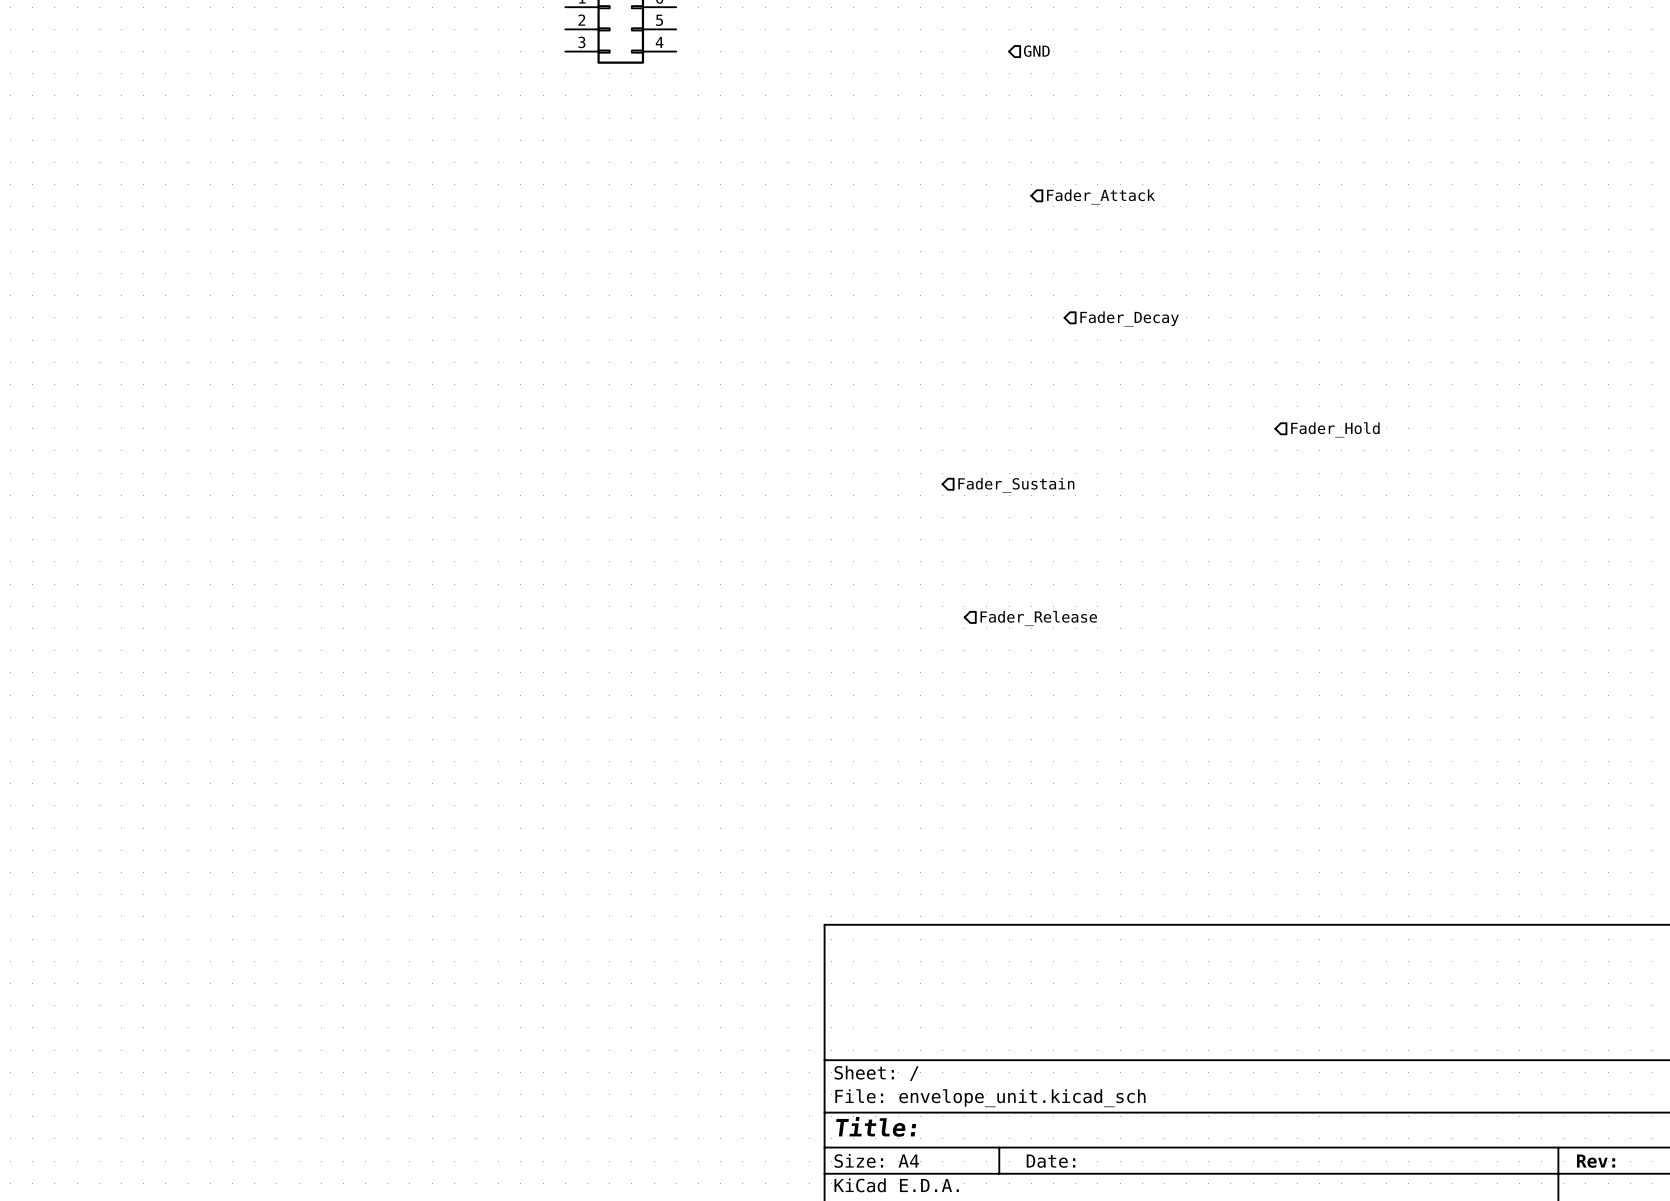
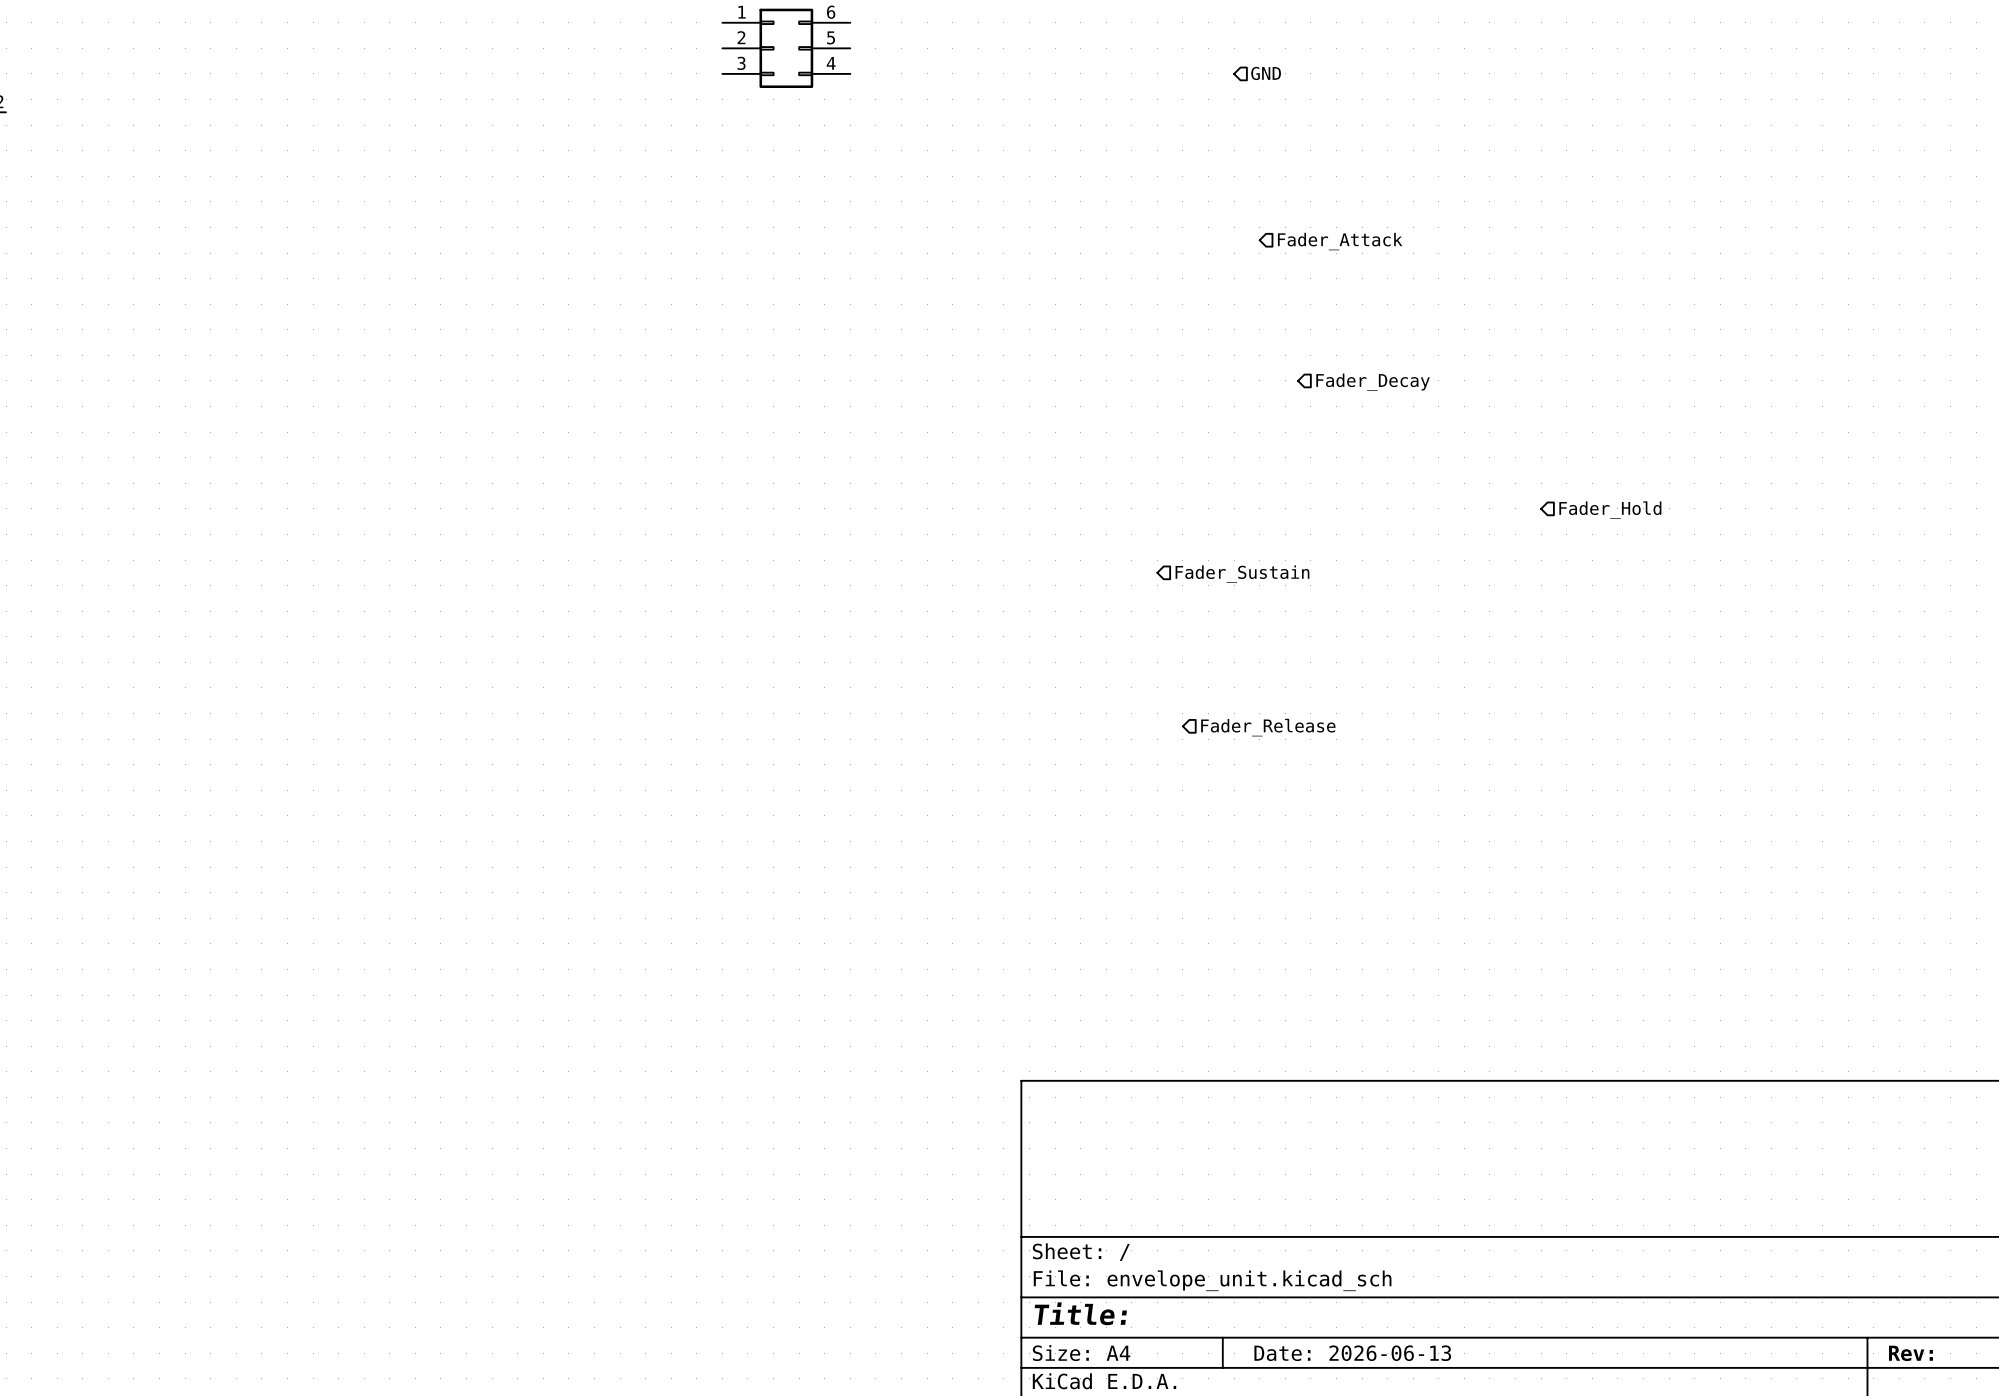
title block: Date: (1050, 1161) -> Date: 2026-06-13 (1352, 1353)

